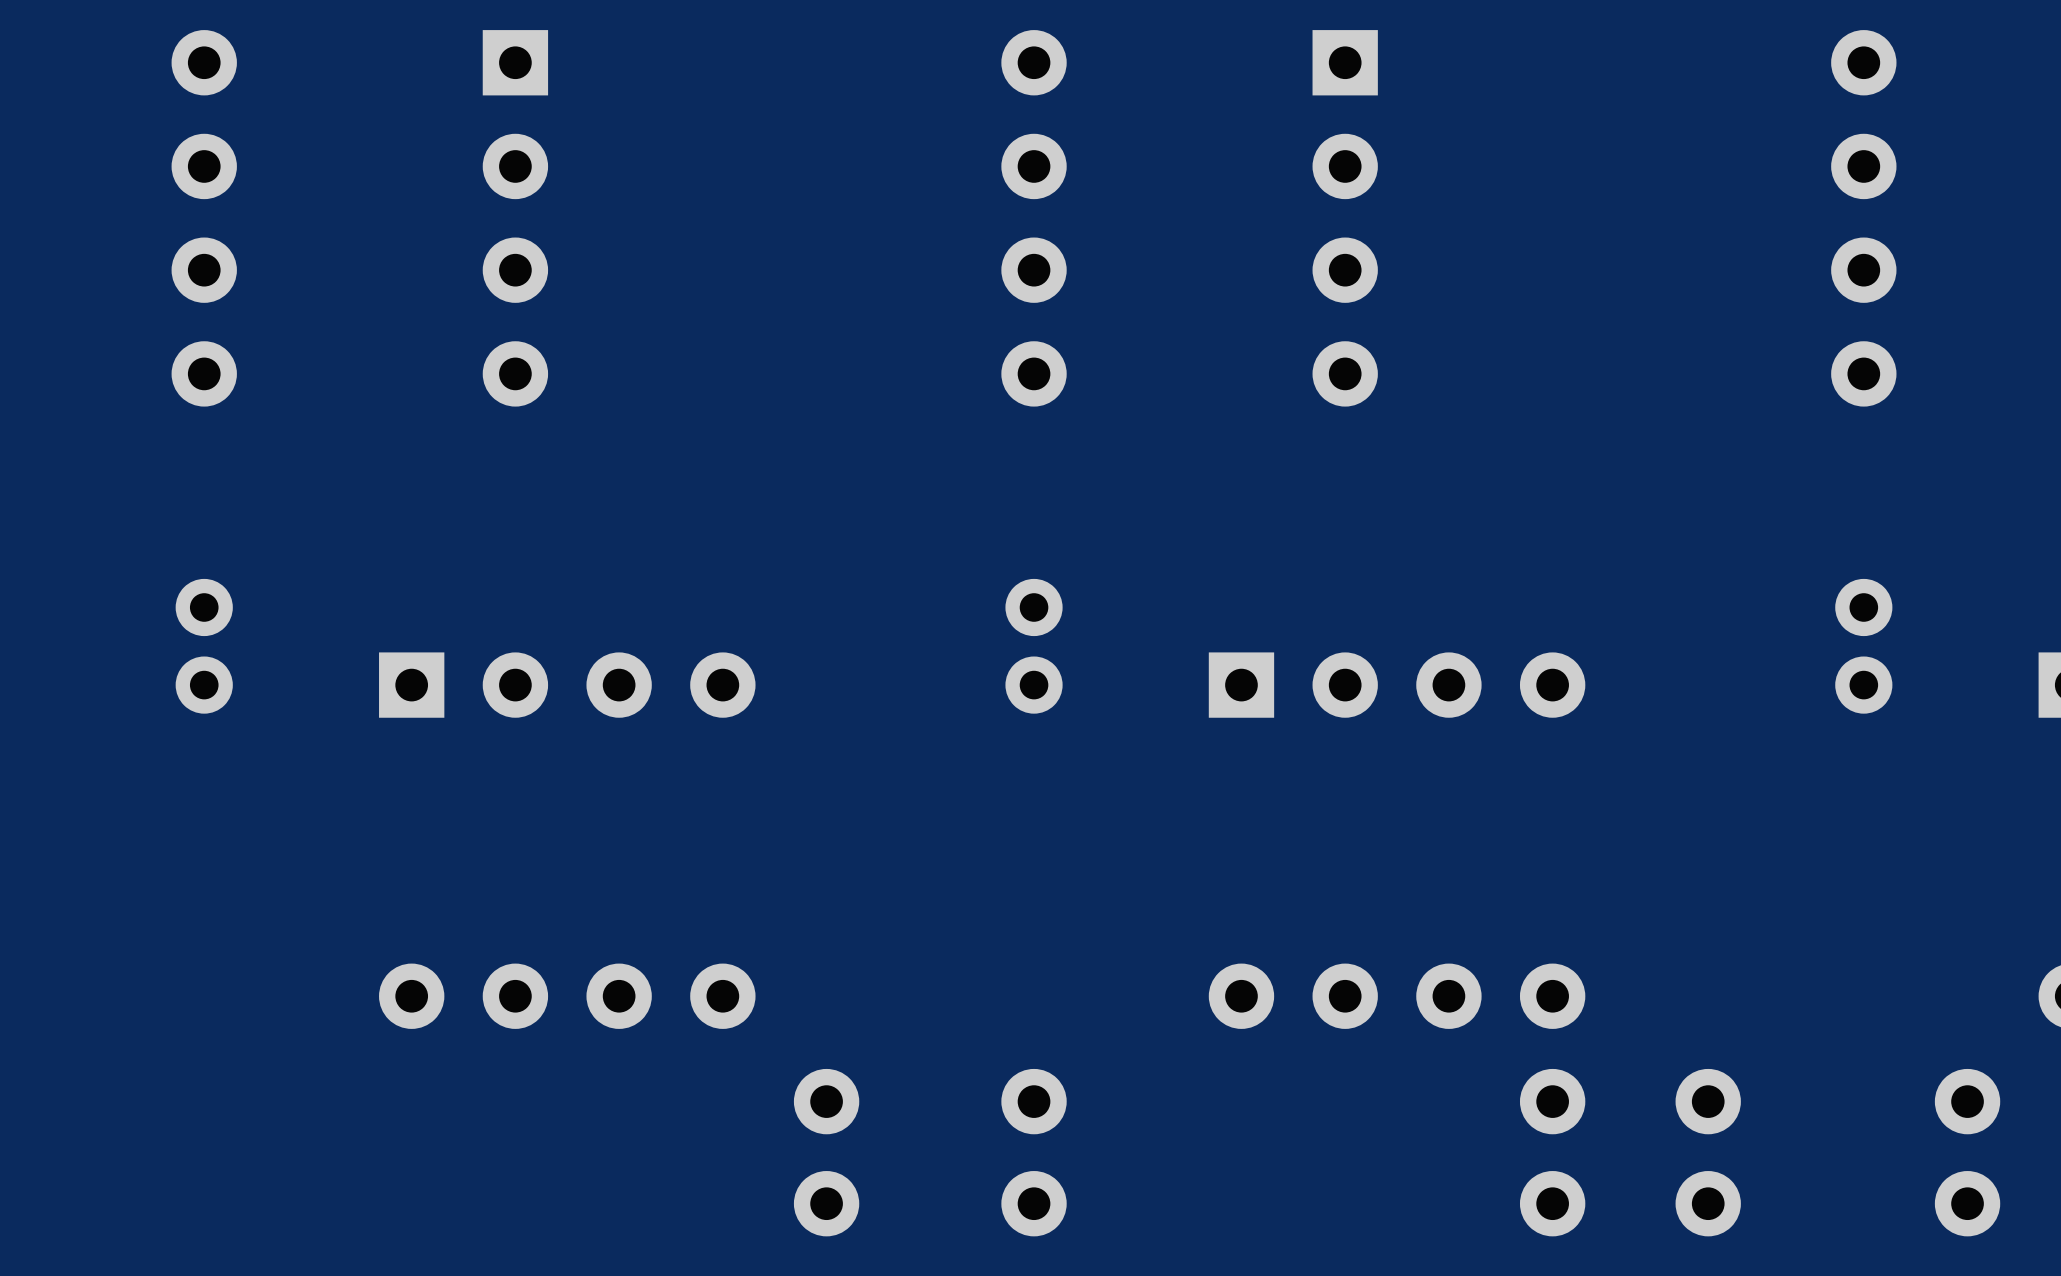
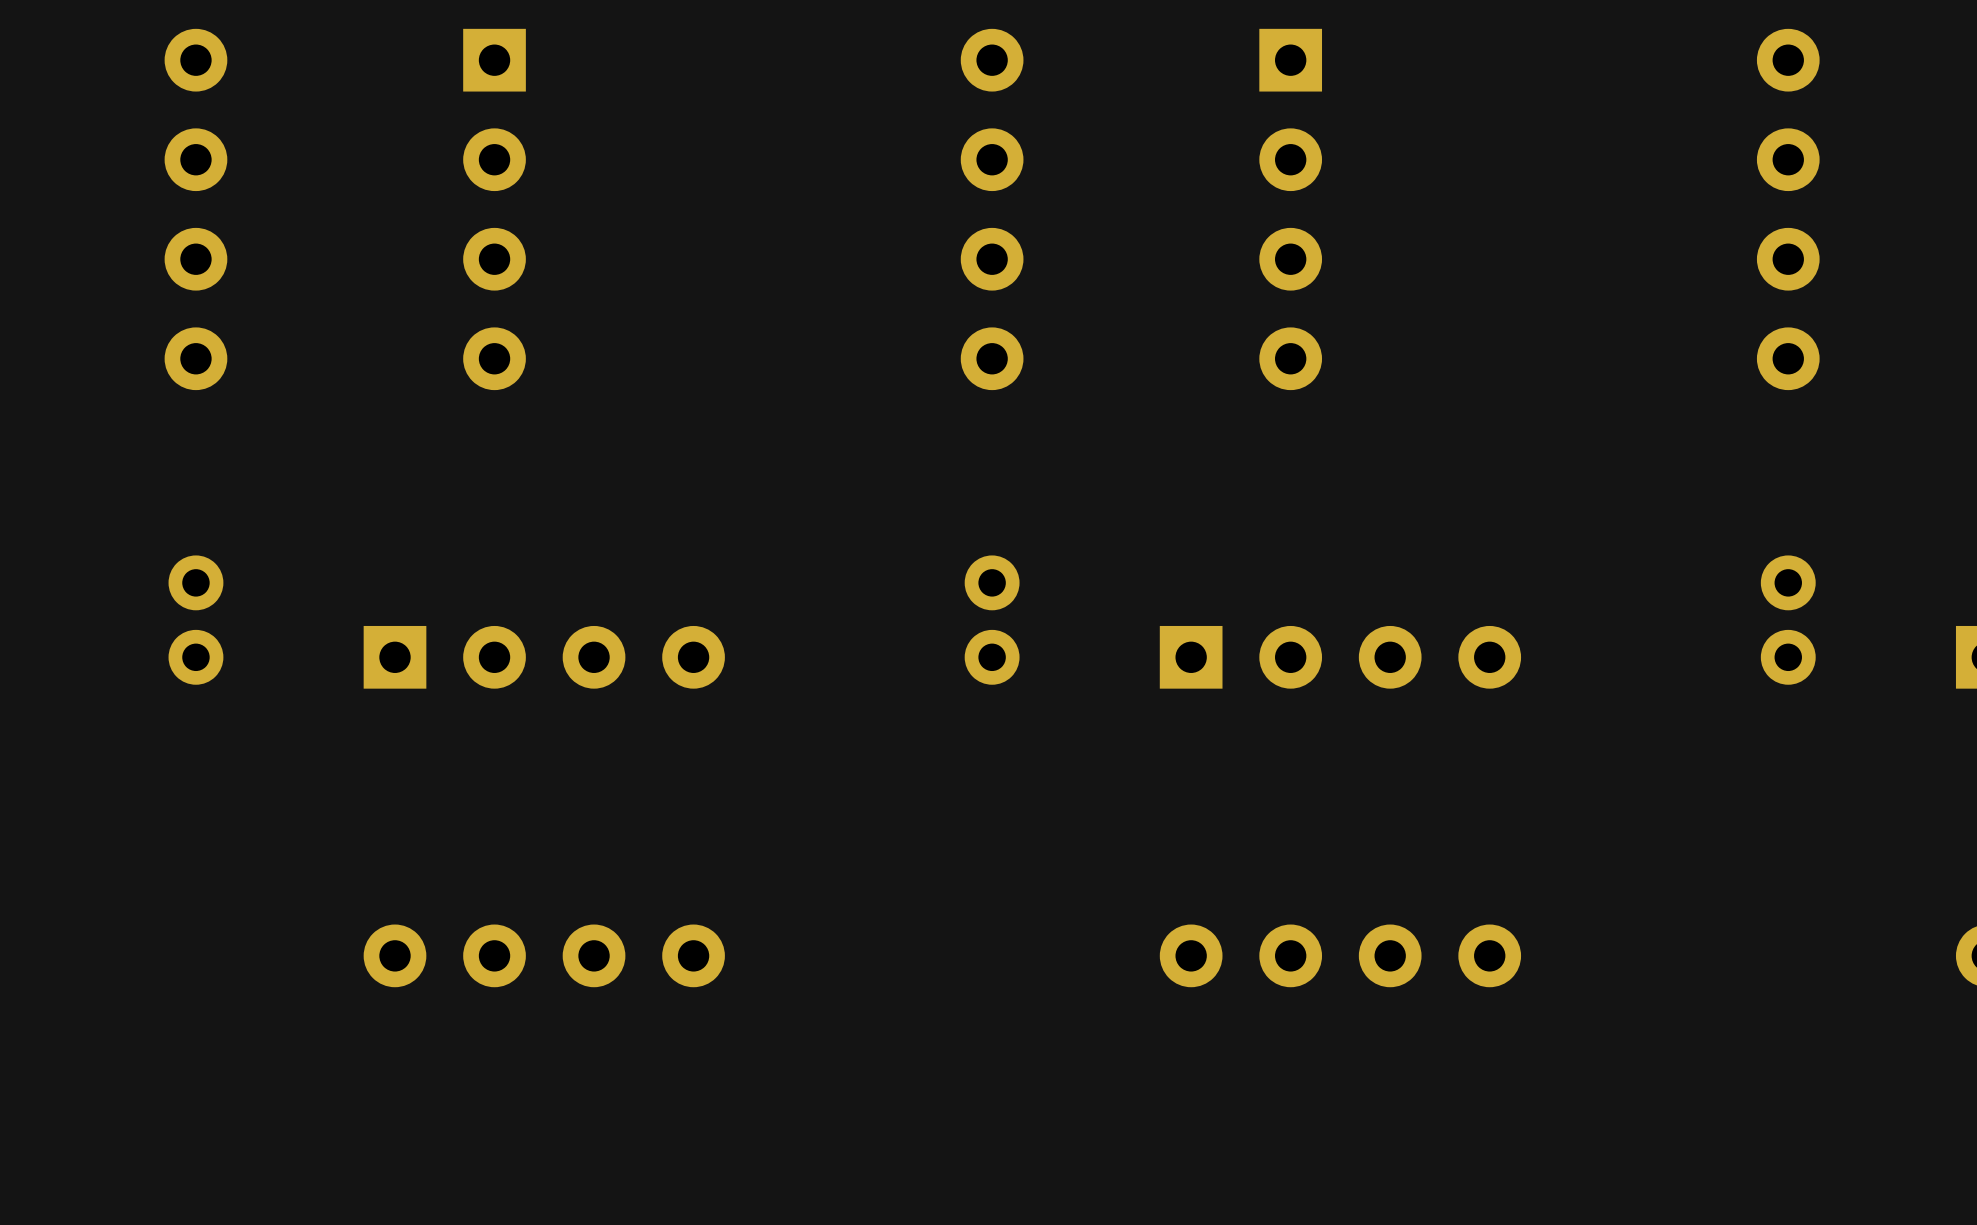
part: (826, 1152) -> none
part: (1034, 1152) -> none
part: (1552, 1152) -> none
part: (1708, 1152) -> none
part: (1967, 1152) -> none

